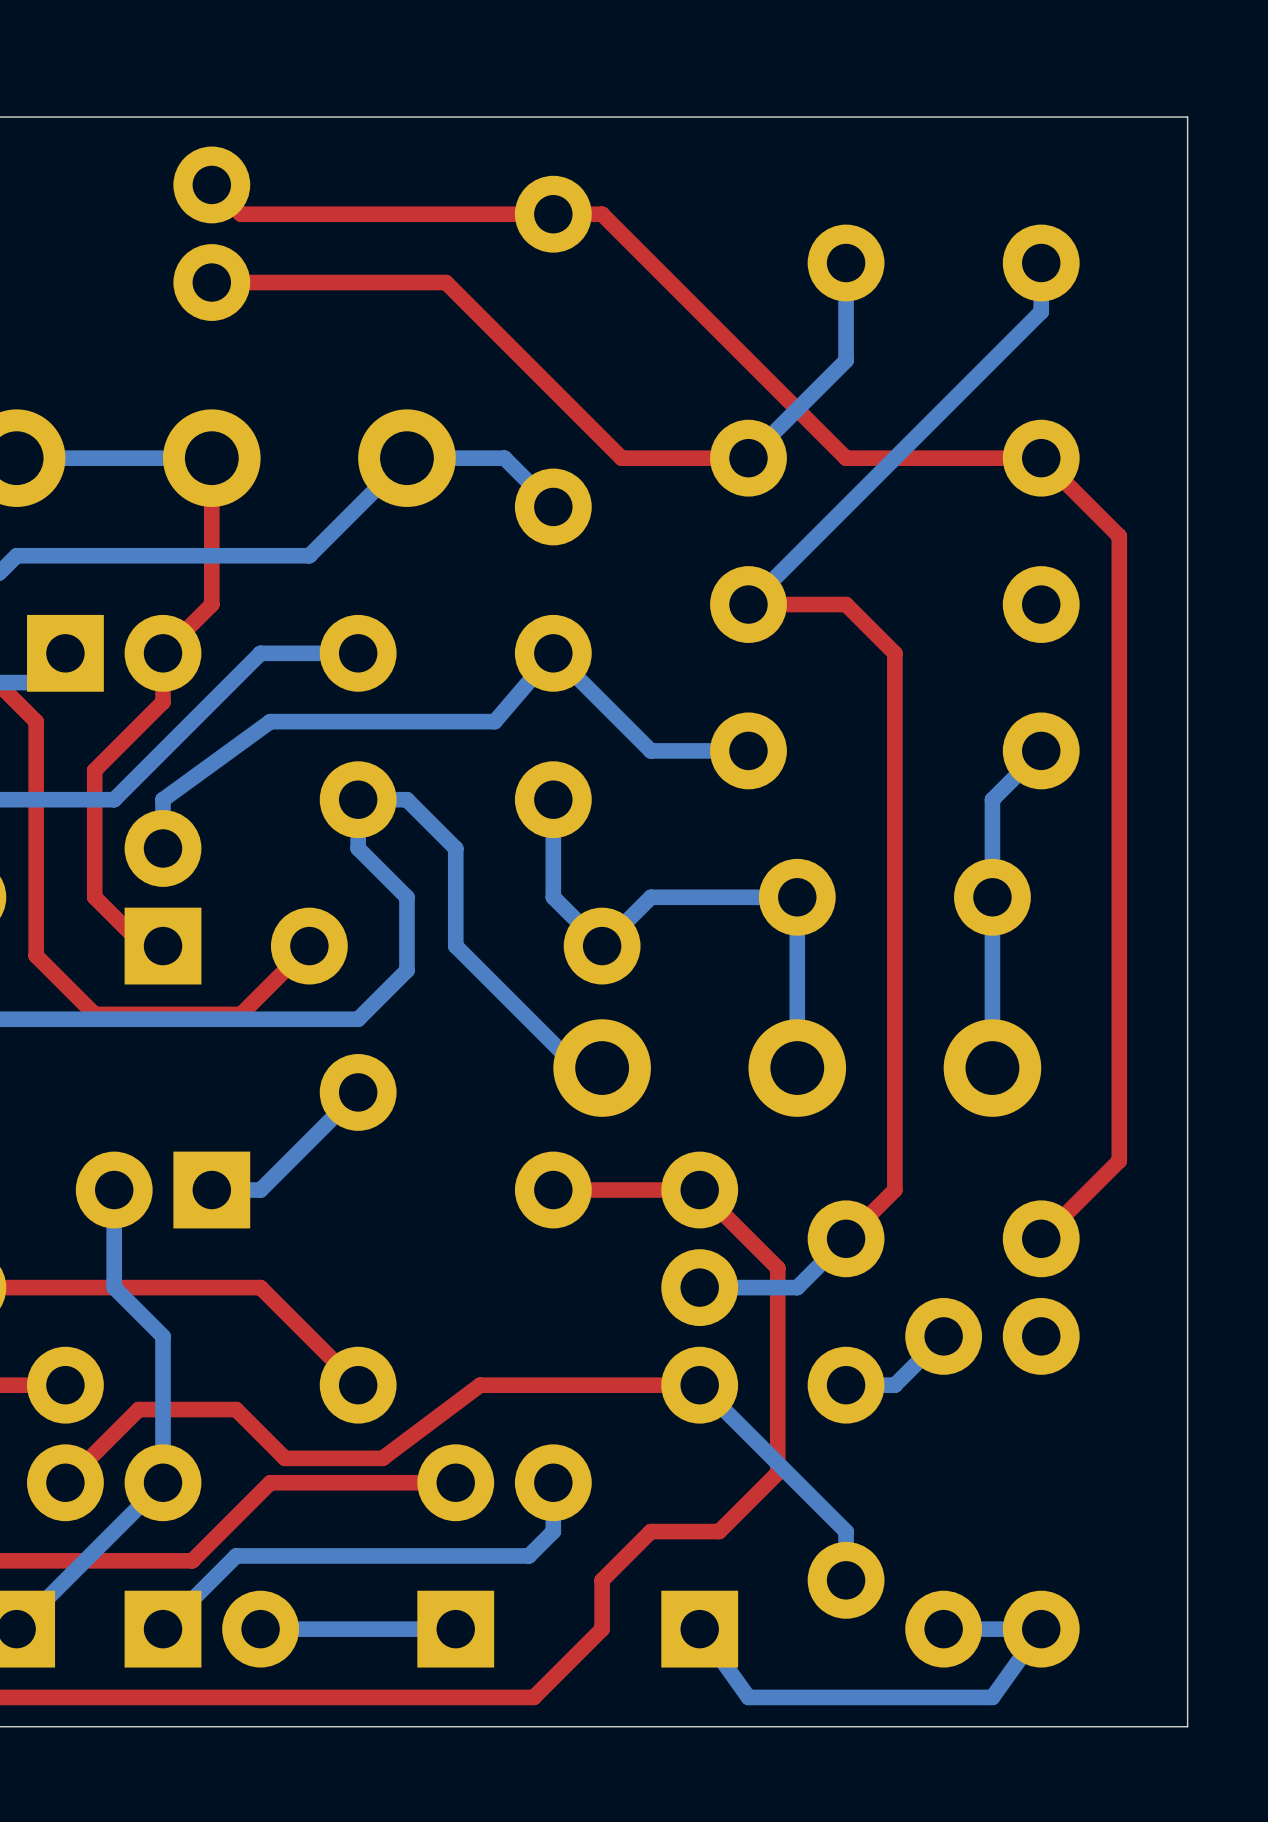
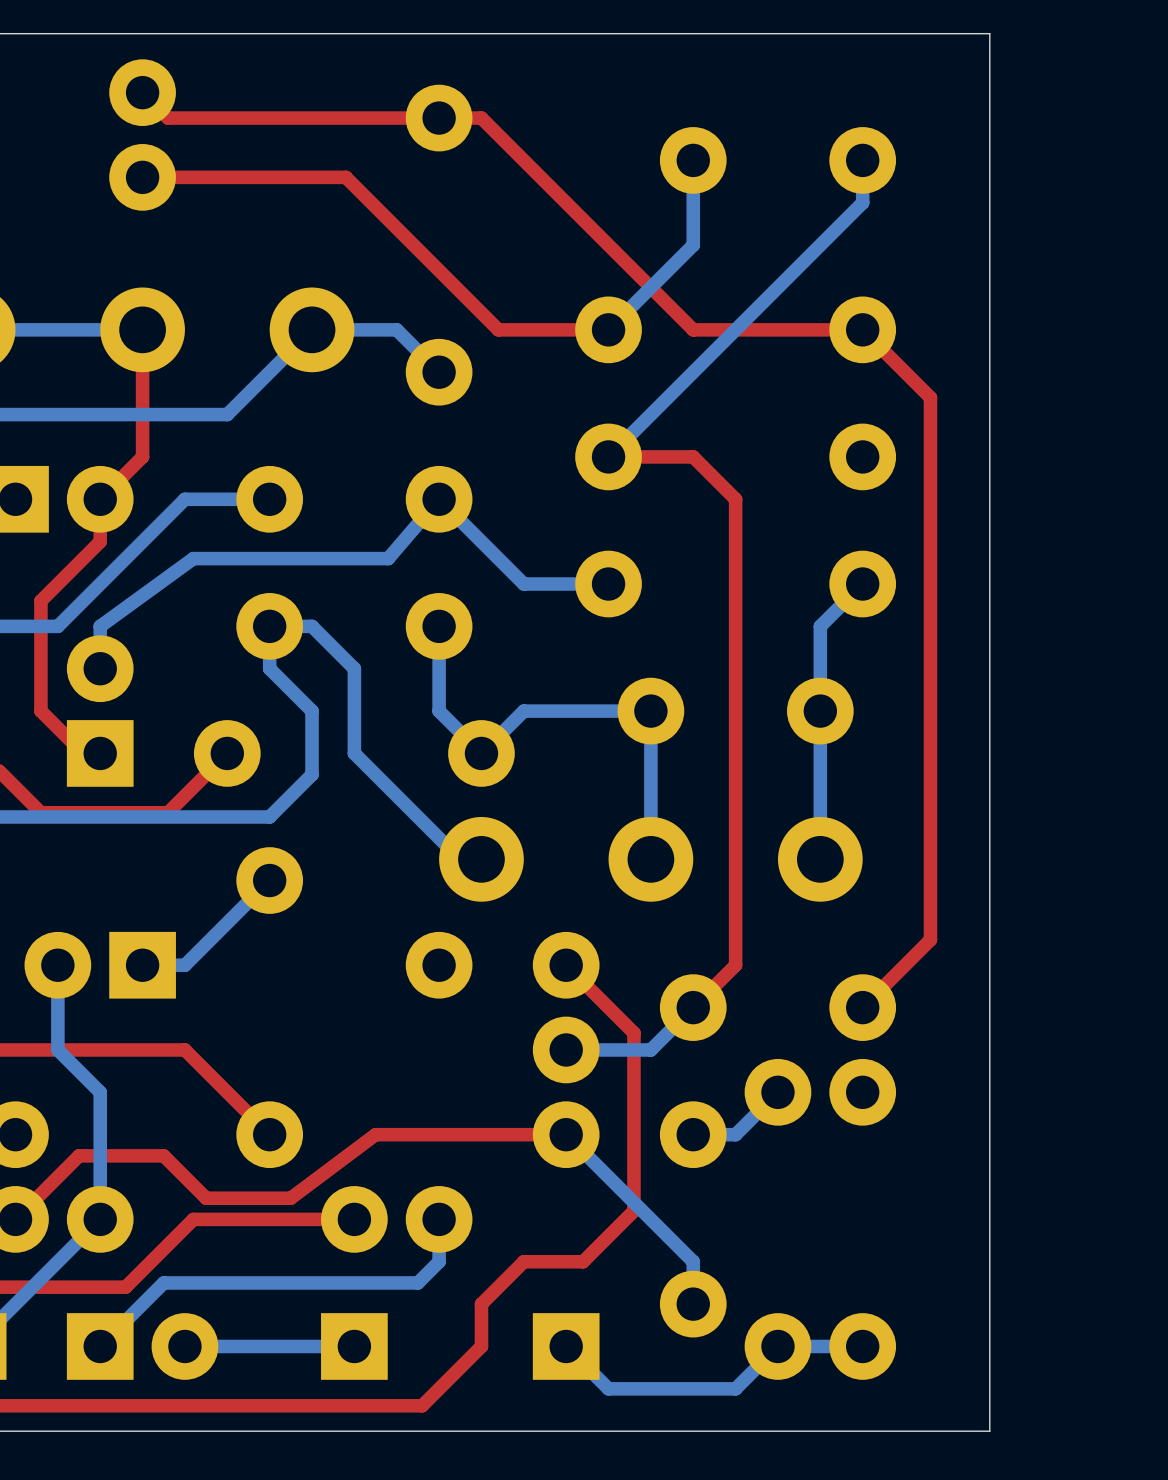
top track: (699, 1190) (553, 1190) -> none
bottom track: (1041, 1629) (992, 1697) (748, 1697) (699, 1629) -> (777, 1346) (735, 1388) (608, 1388) (566, 1346)

